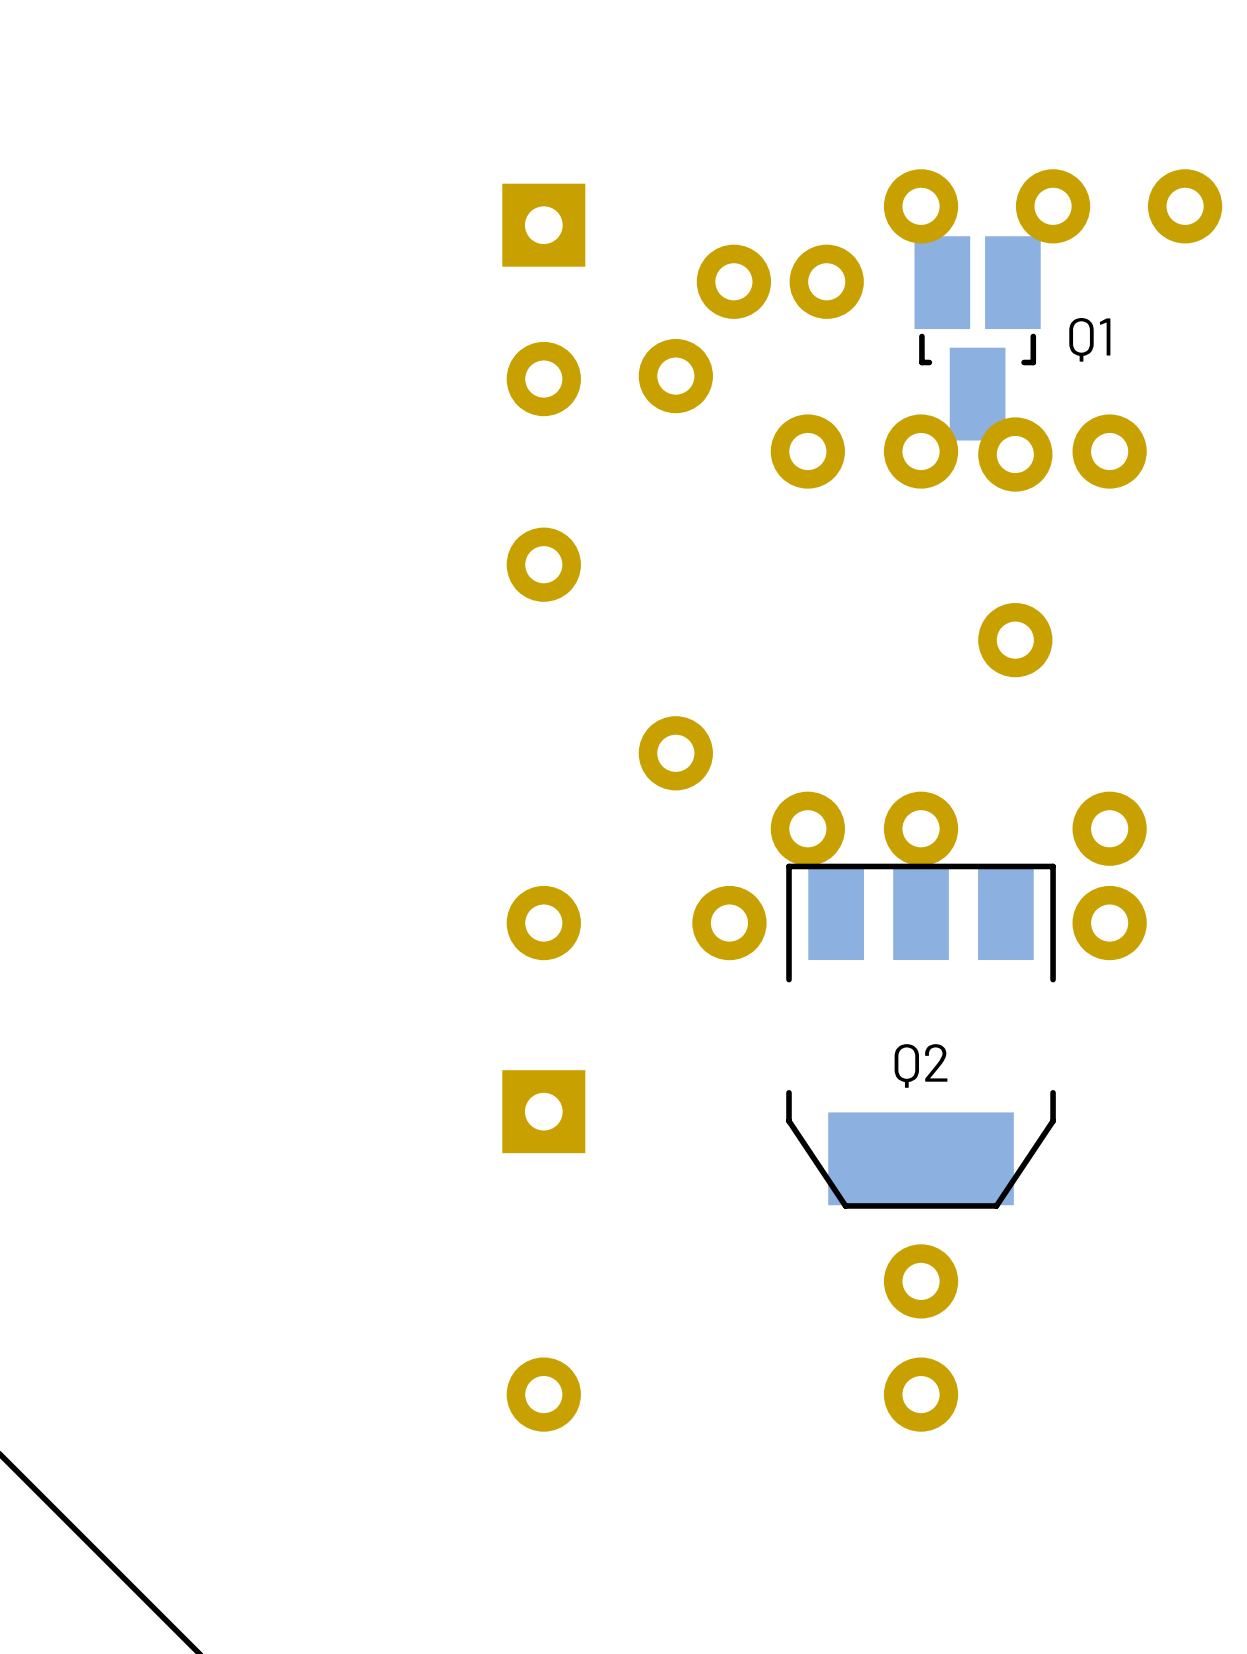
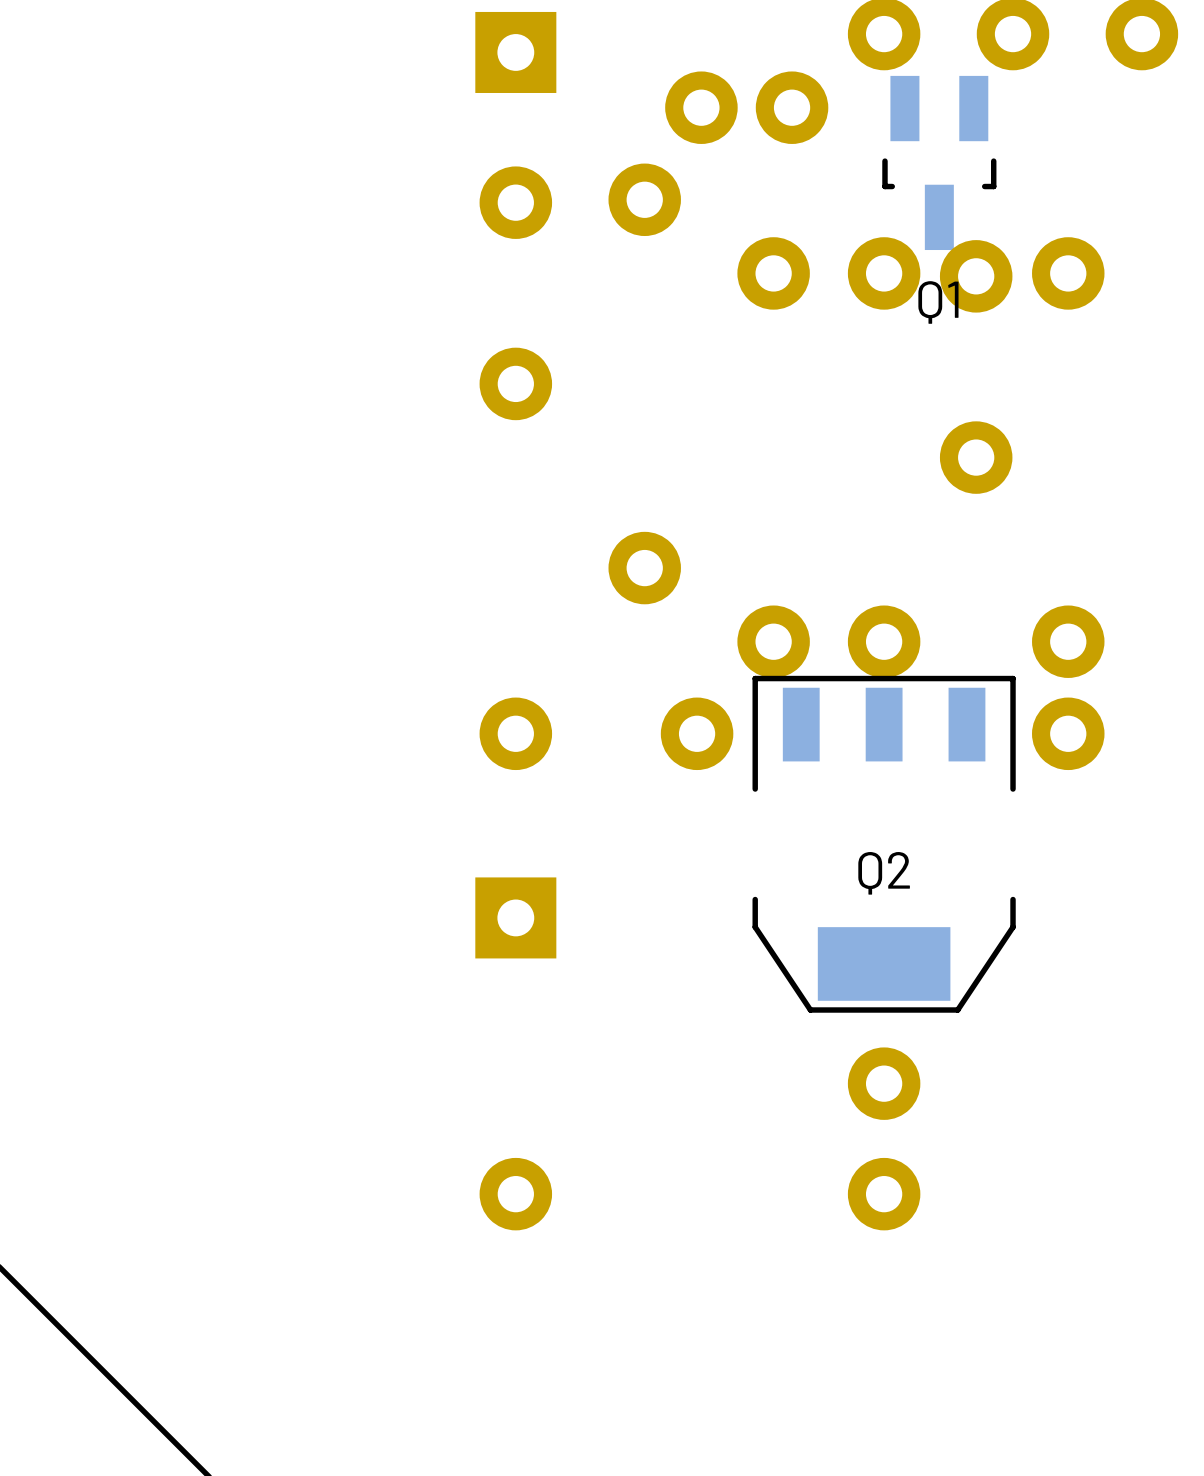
Q1 footprint: [914, 236, 1041, 441] -> [882, 75, 997, 251]
Q1 name position: Q1 (1089, 339) -> Q1 (938, 302)
Q2 footprint: [786, 863, 1056, 1209] -> [752, 675, 1016, 1013]

